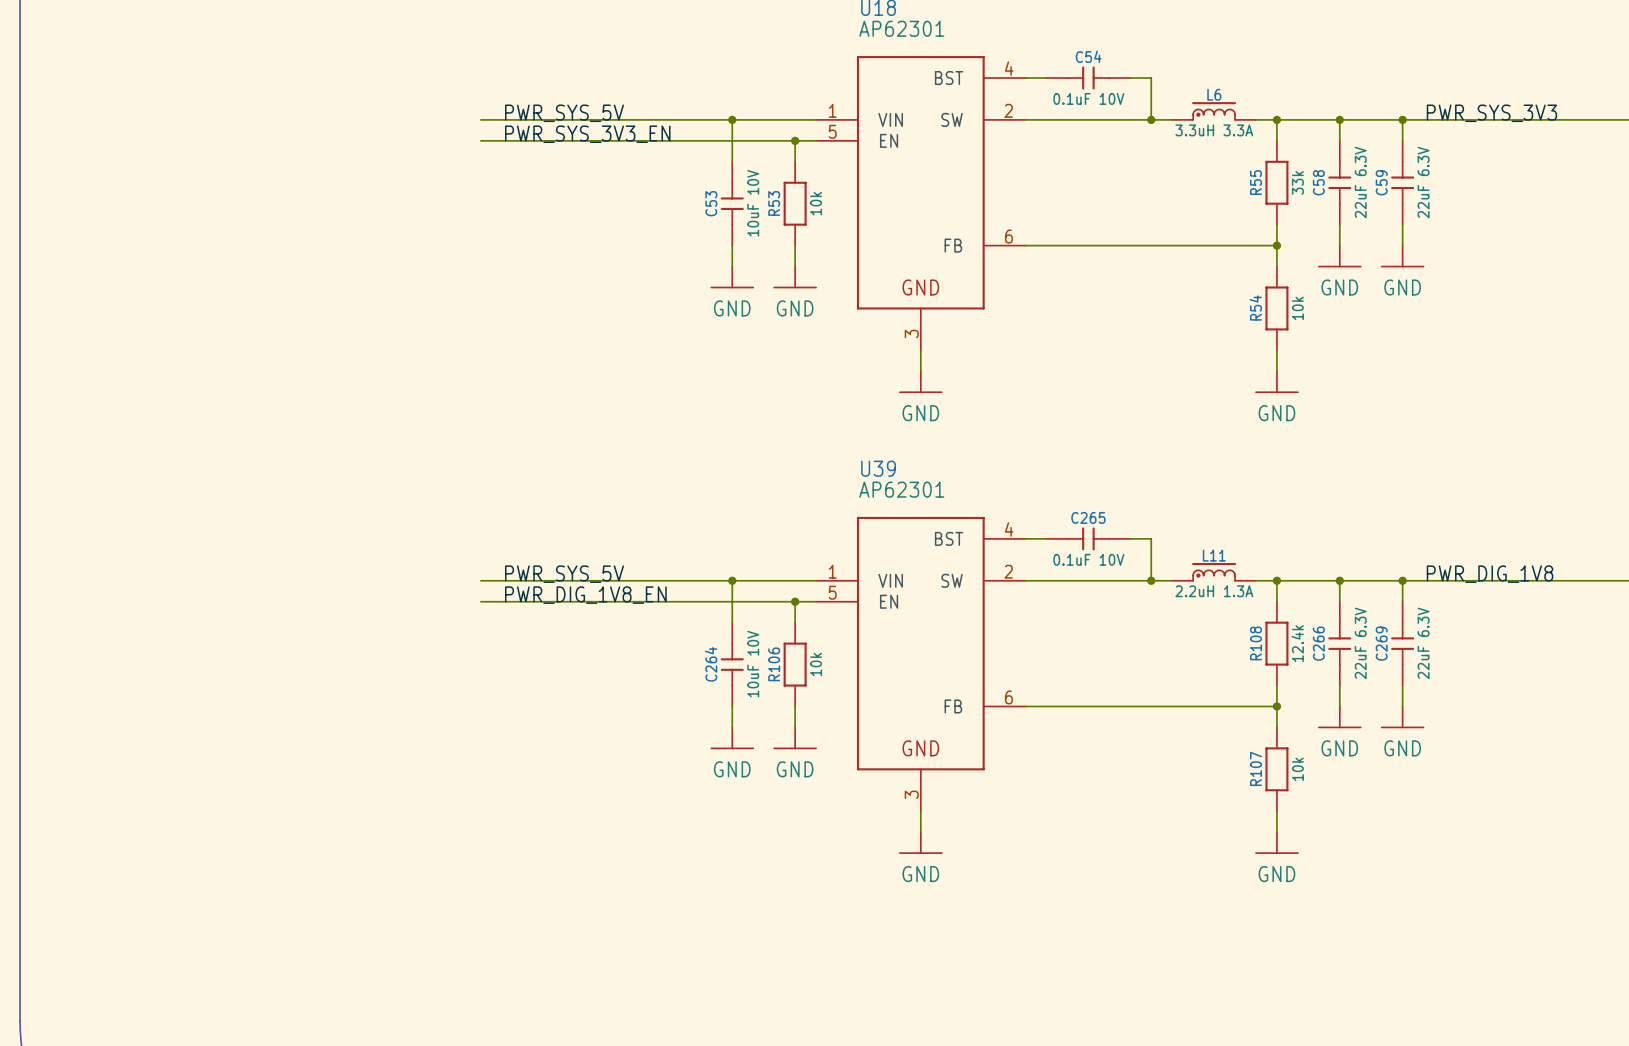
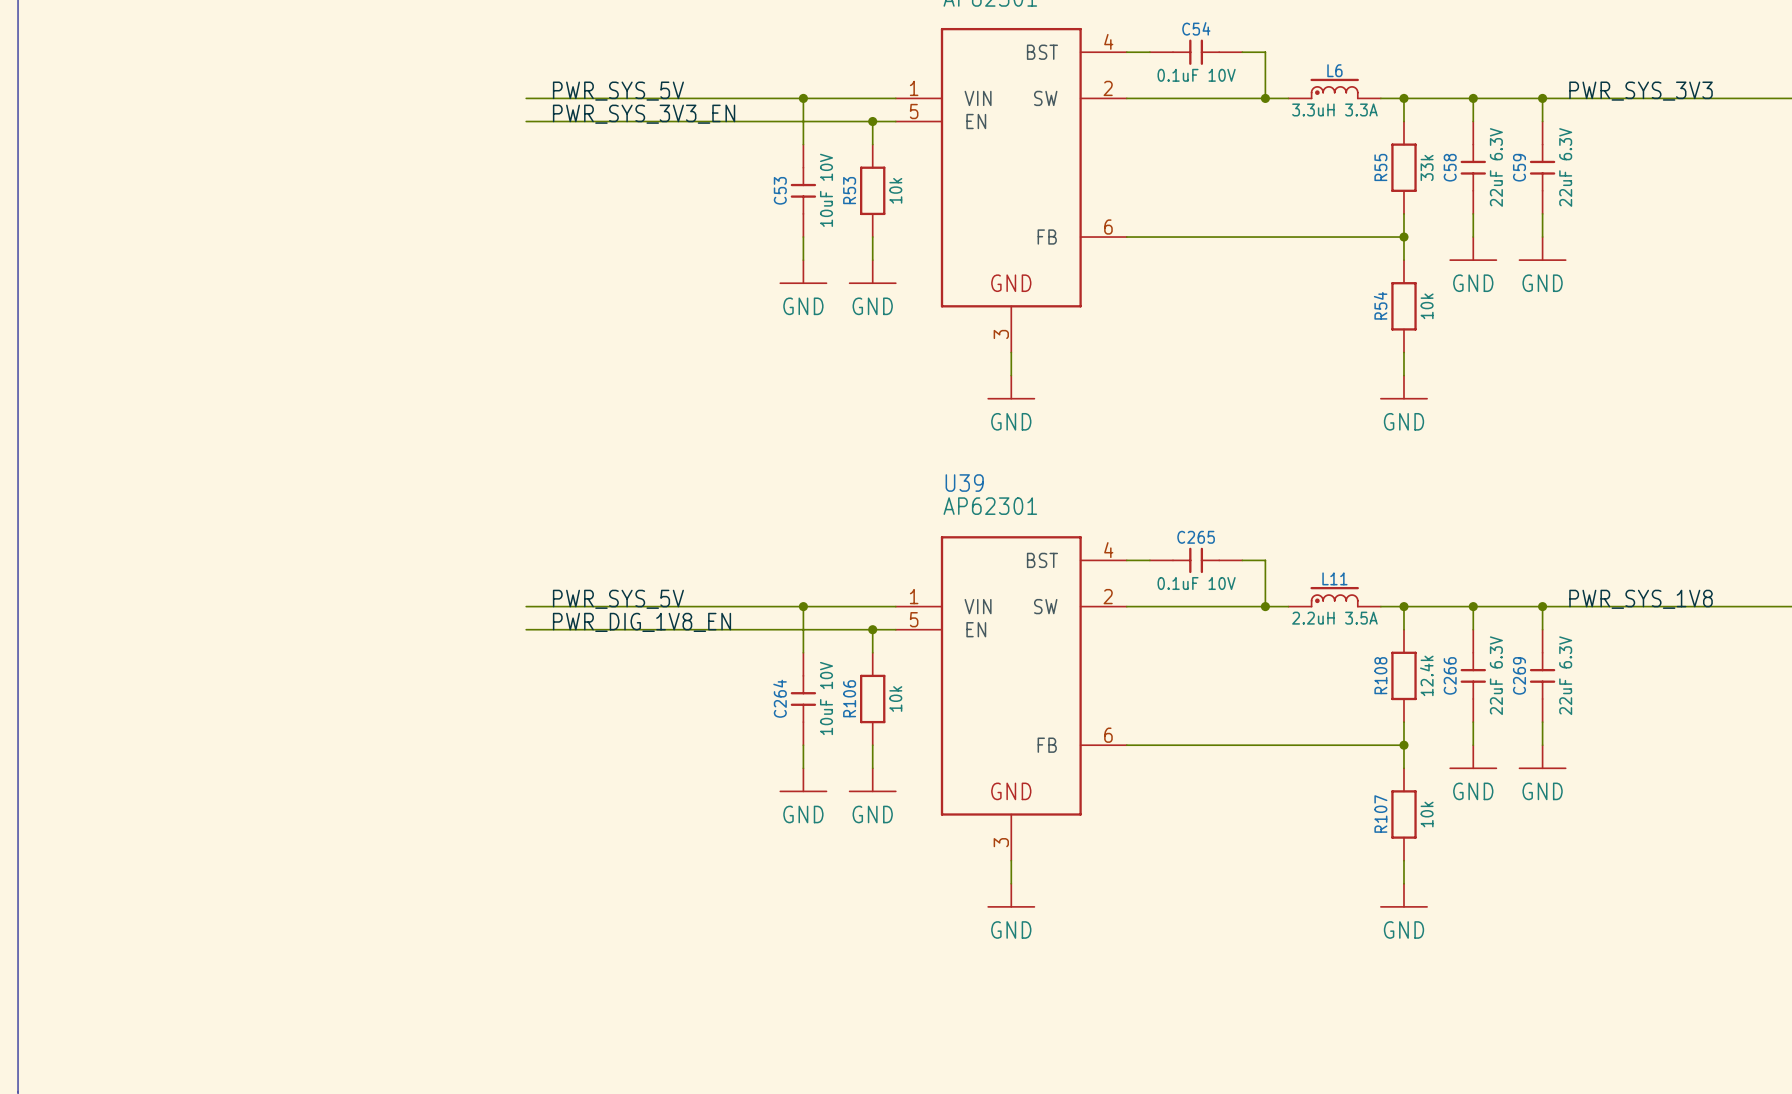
label: PWR_DIG_1V8 (1490, 574) -> PWR_SYS_1V8 (1641, 599)
L11 value: 2.2uH 1.3A (1214, 591) -> 2.2uH 3.5A (1334, 618)

